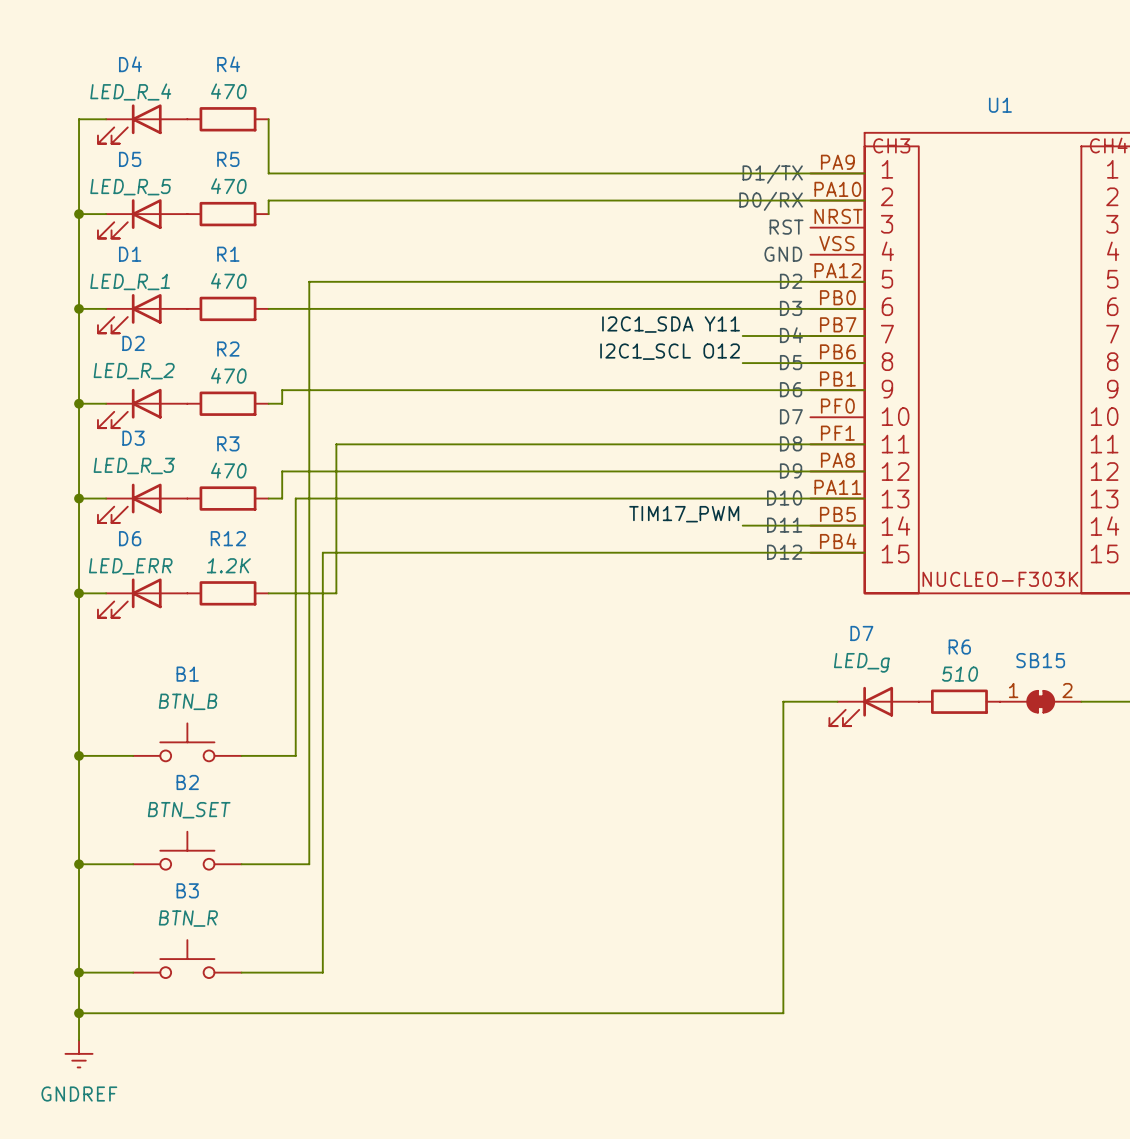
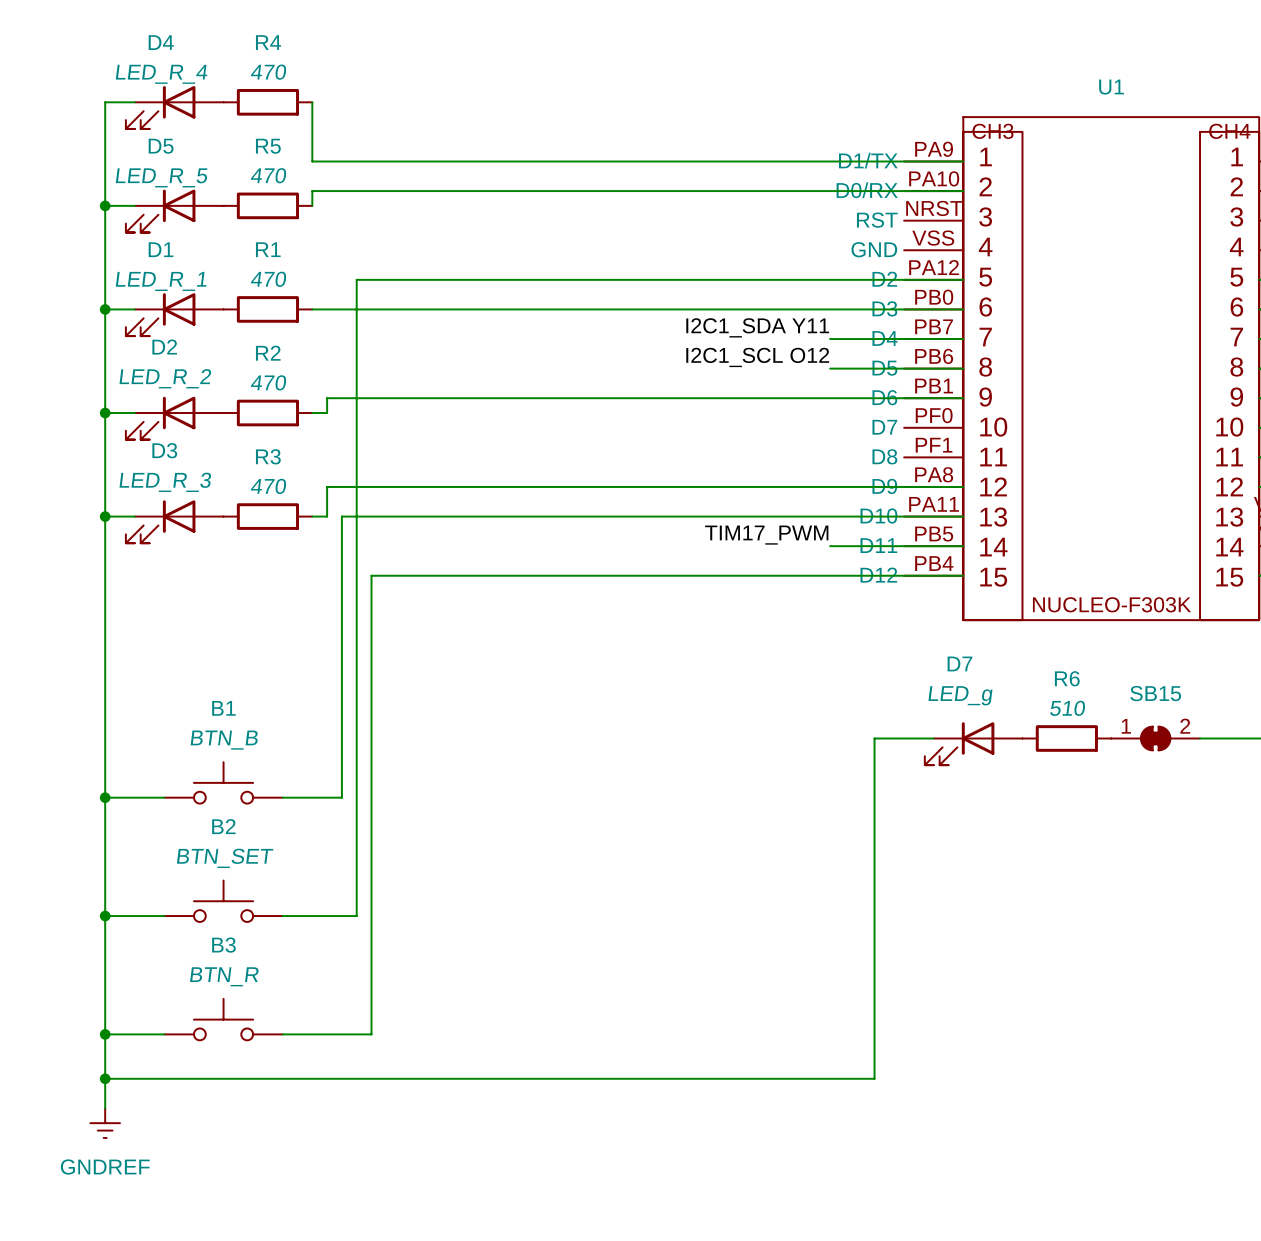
wire: (864, 444) (336, 444) (336, 593) (268, 593) -> none
wire: (79, 593) (106, 593) -> none
junction: (79, 593) -> none
R12: 1.2K (228, 593) -> none
D6: LED_ERR (142, 598) -> none

